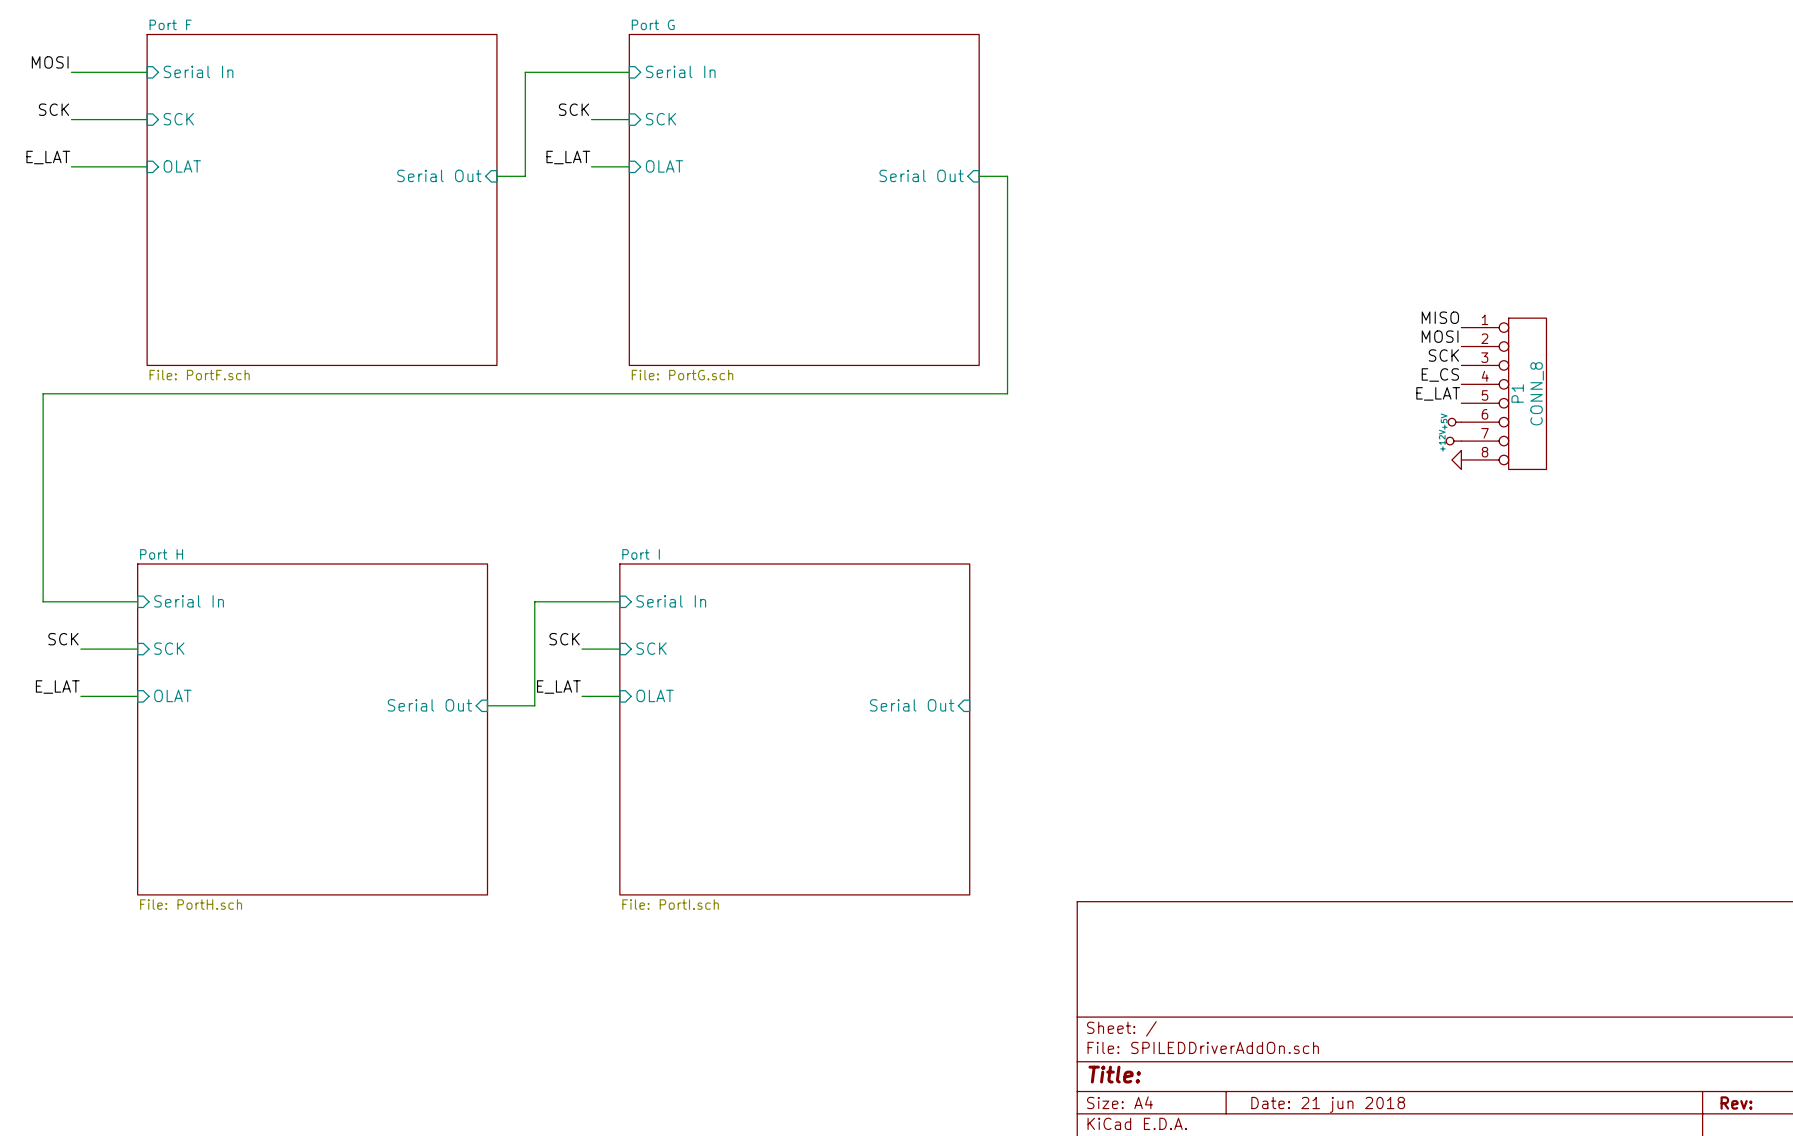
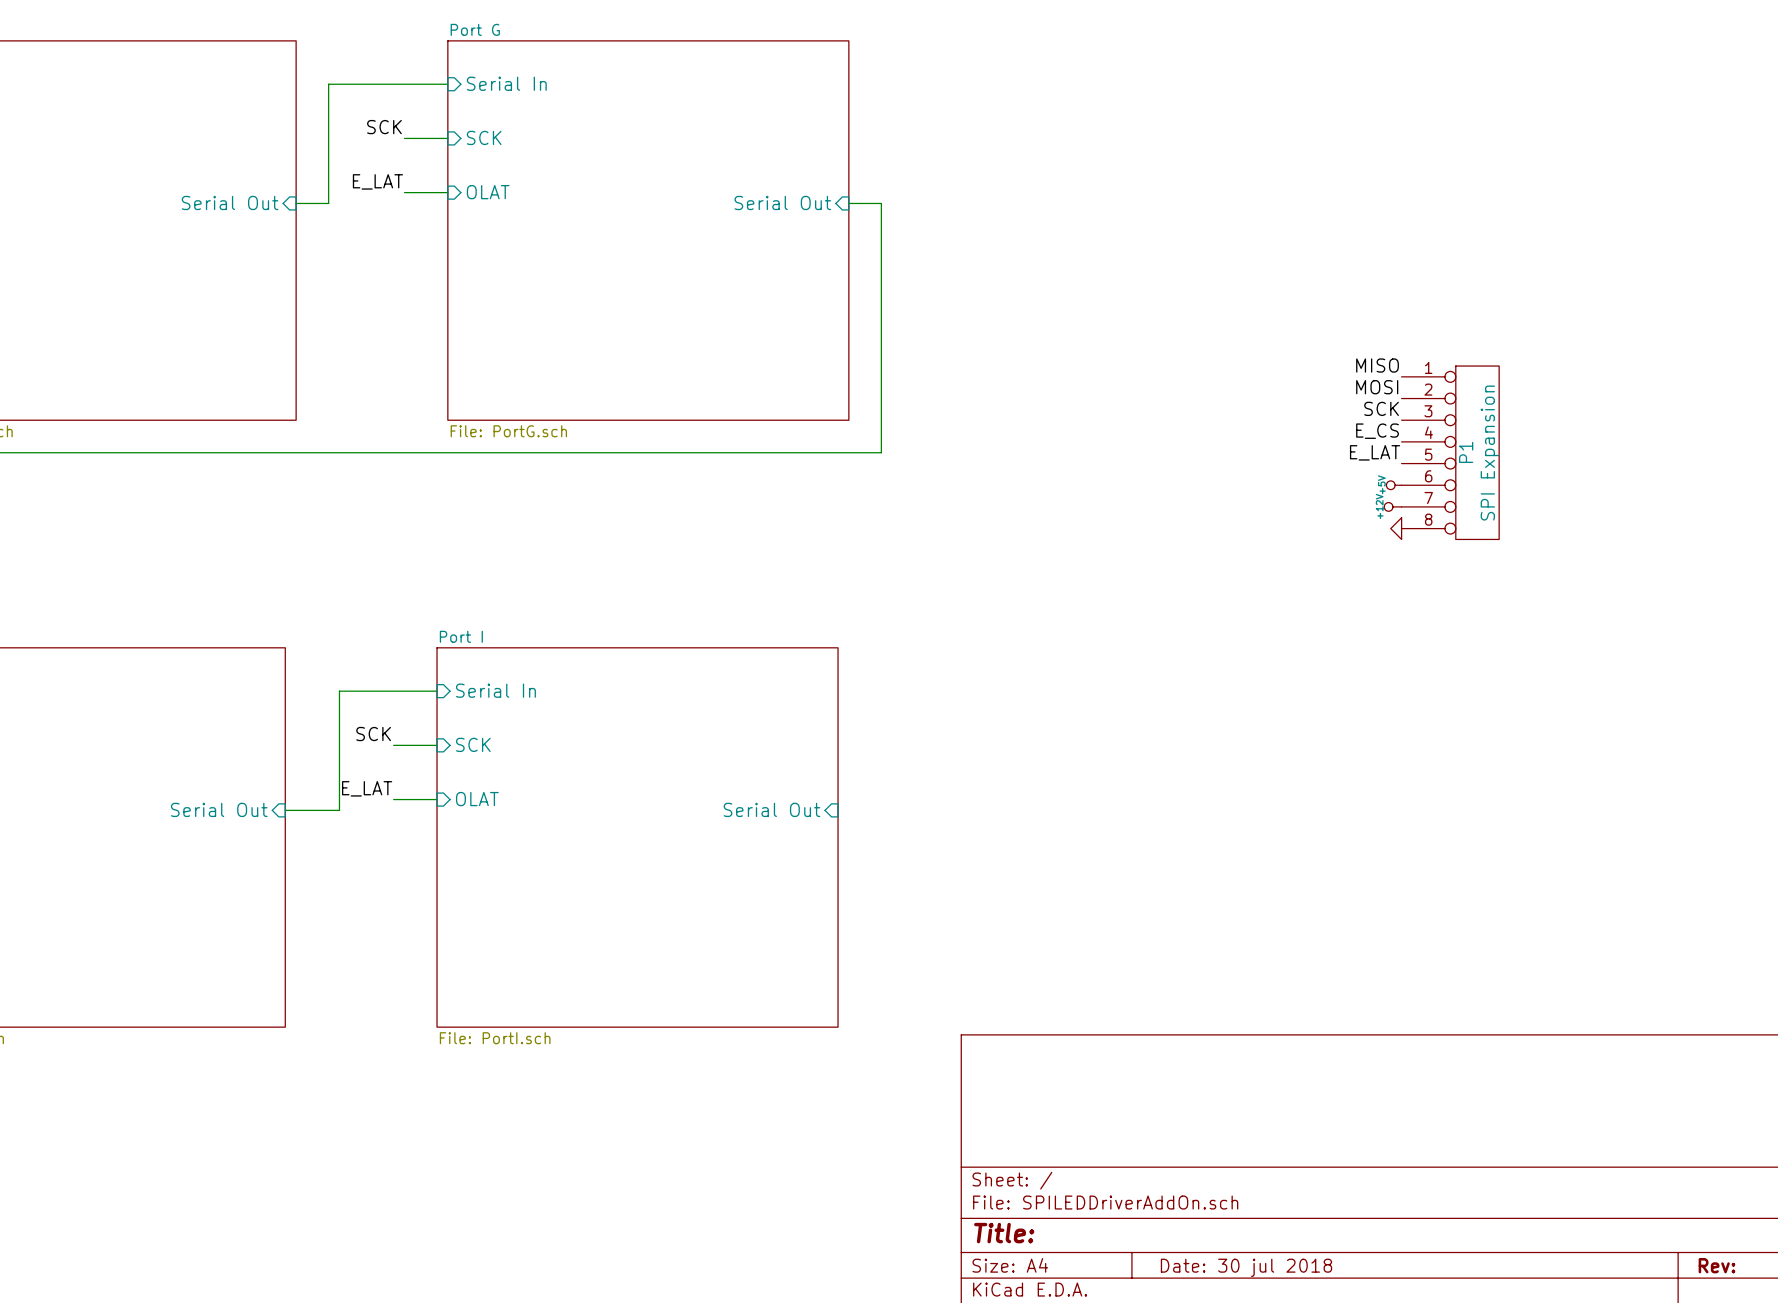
P1 value: CONN_8 (1537, 393) -> SPI Expansion (1489, 453)
title block: Date: 21 jun 2018 (1328, 1104) -> Date: 30 jul 2018 (1246, 1267)

